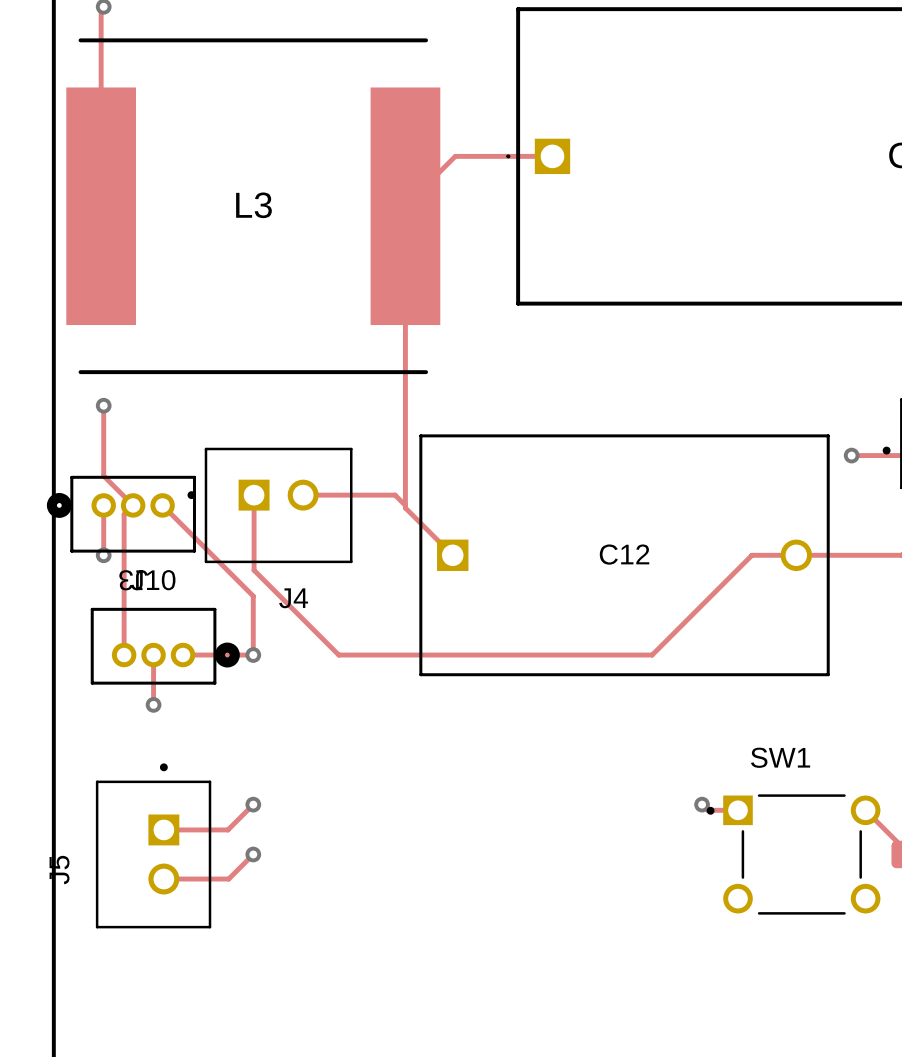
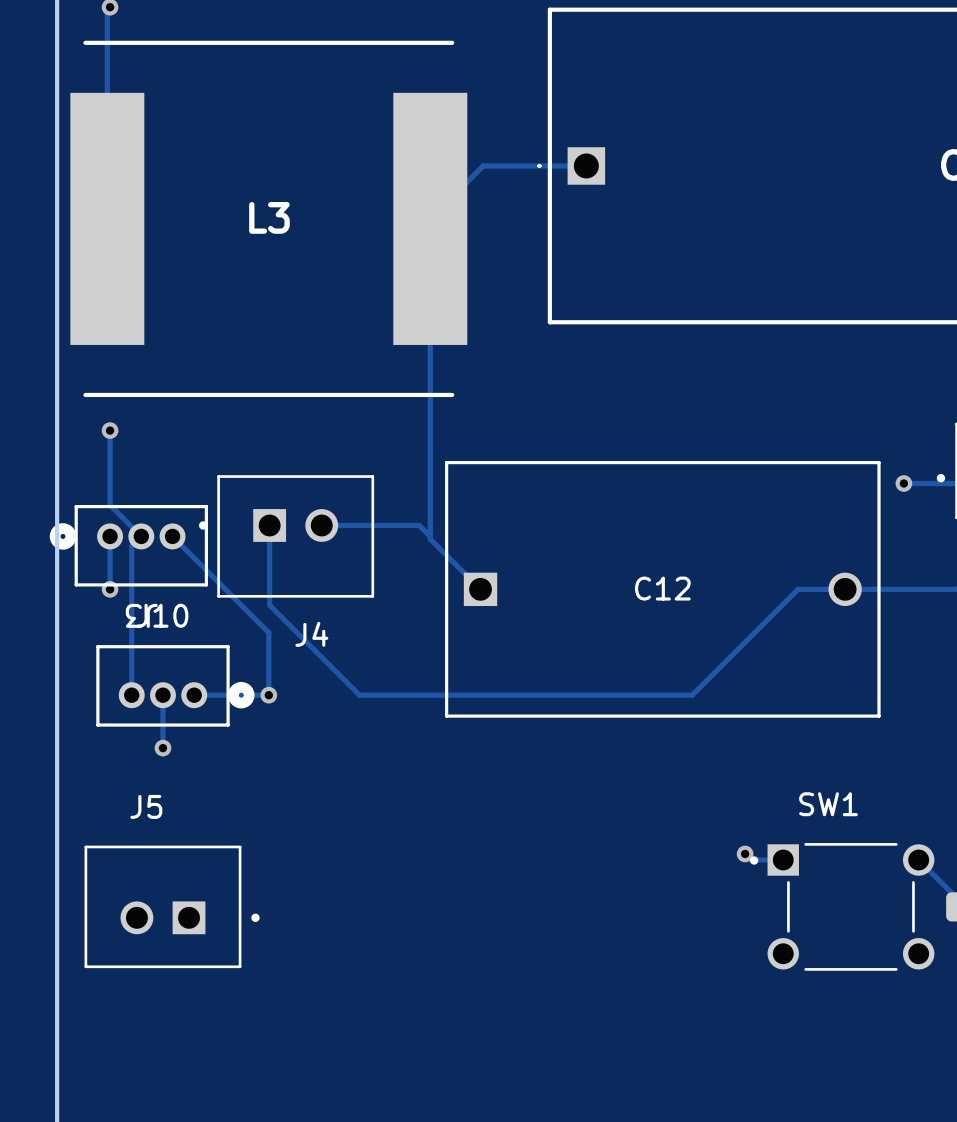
track: (253, 804) (227, 829) (163, 829) -> none
via: (253, 804) -> none
J5 rotation: 0° (153, 845) -> 90° clockwise (172, 906)
track: (253, 854) (228, 879) (163, 879) -> none
via: (253, 854) -> none

